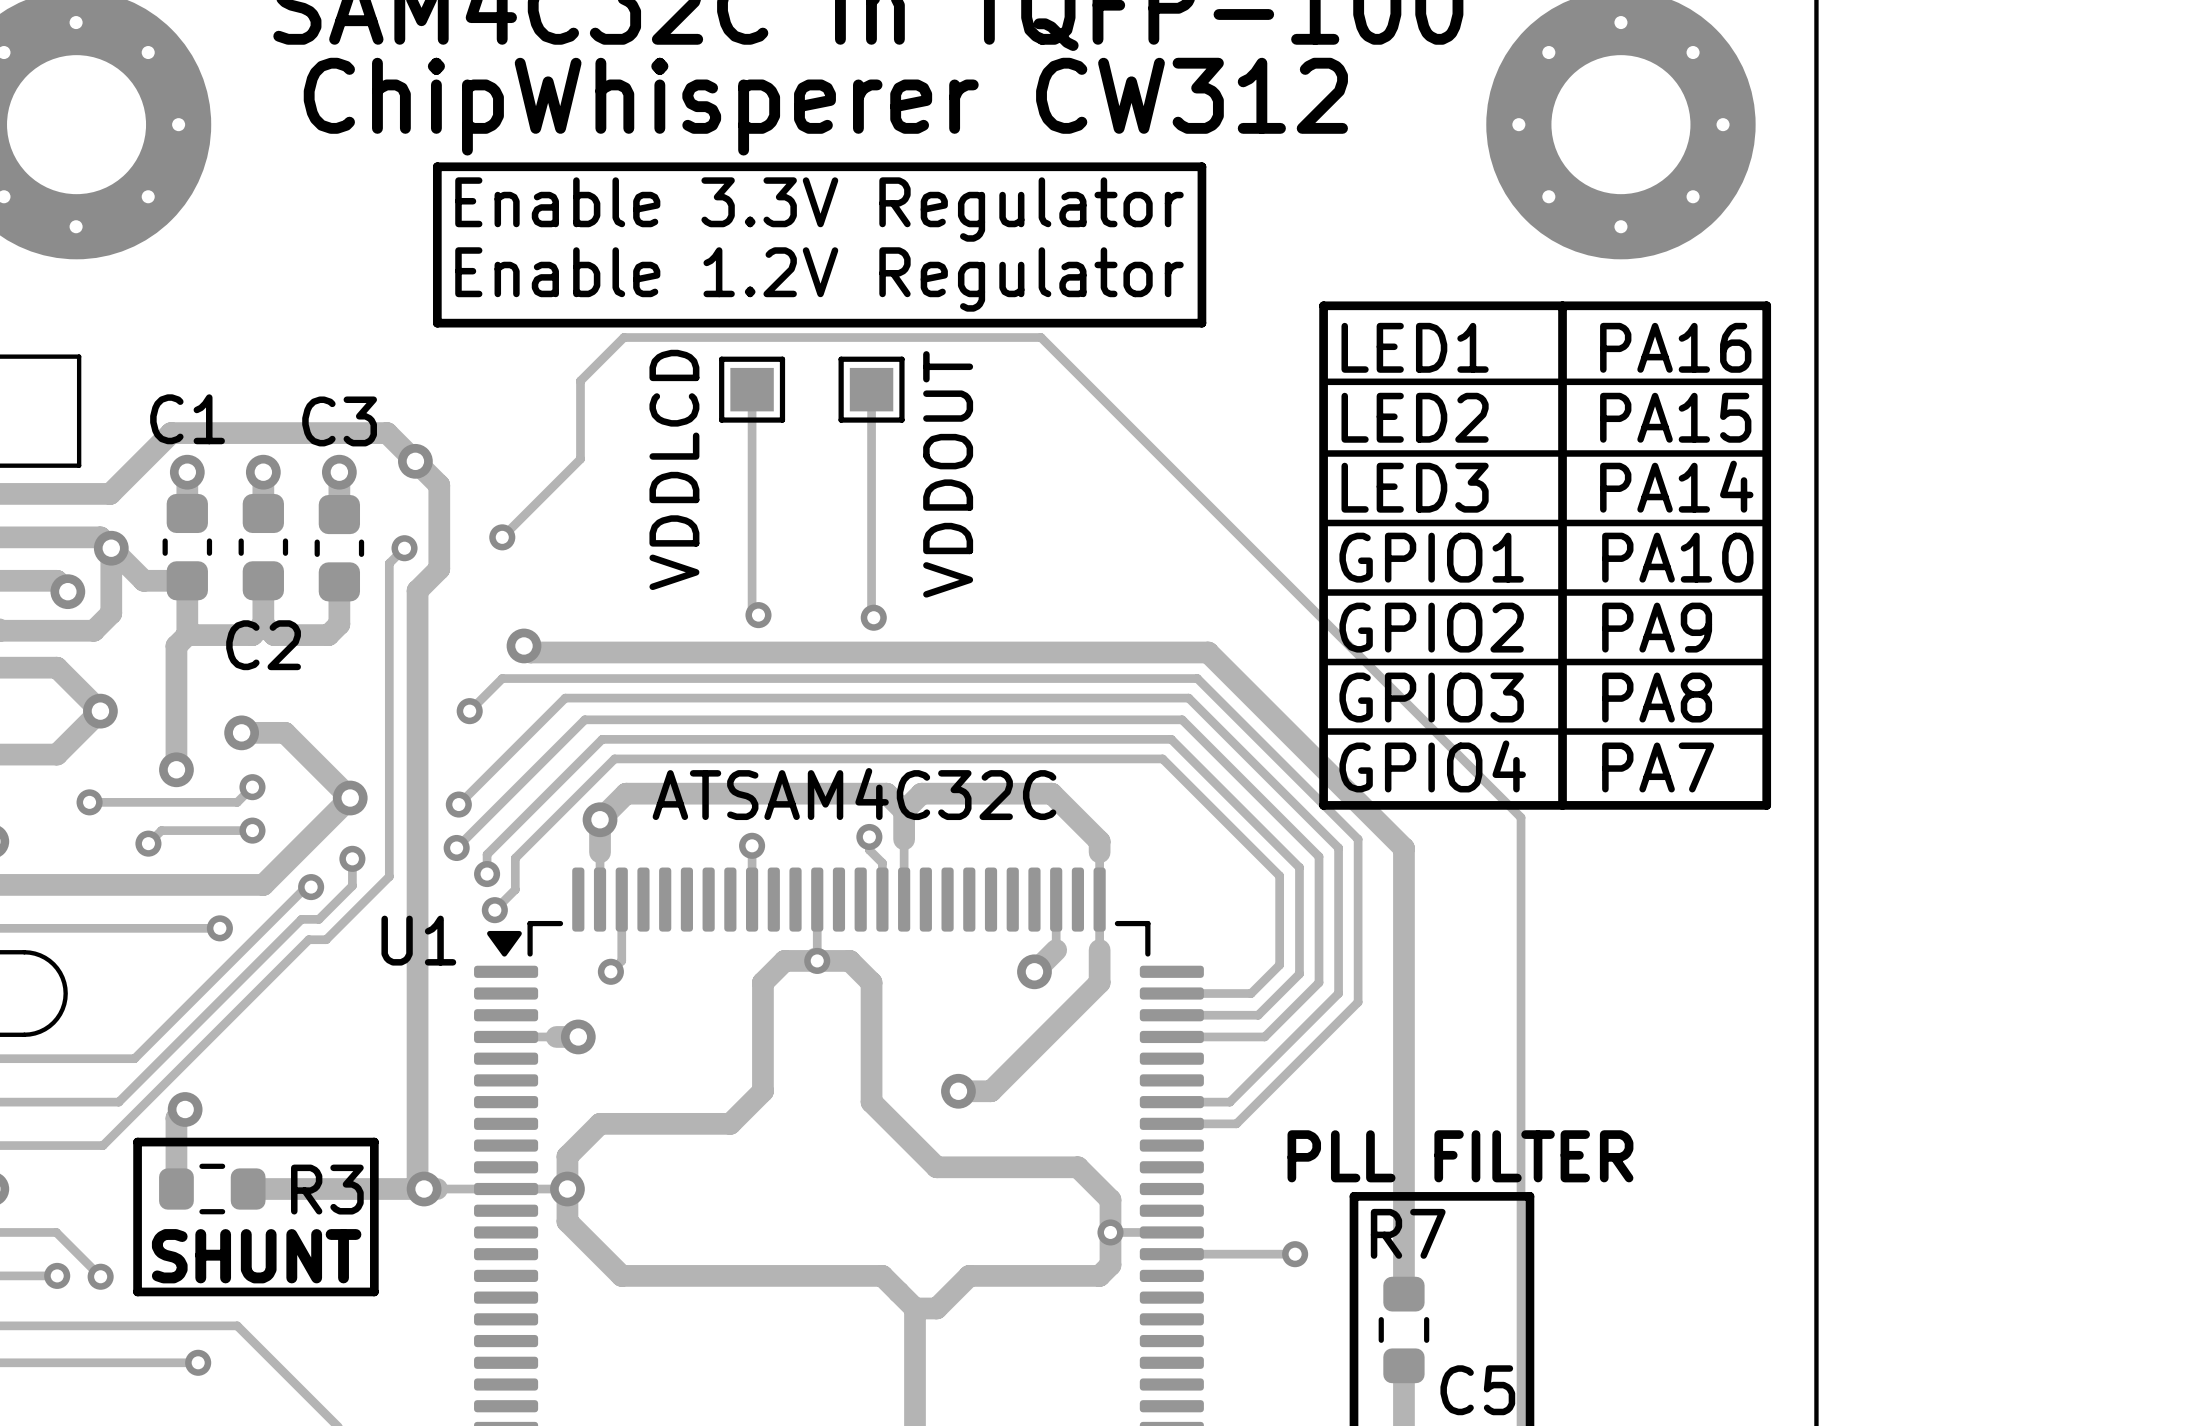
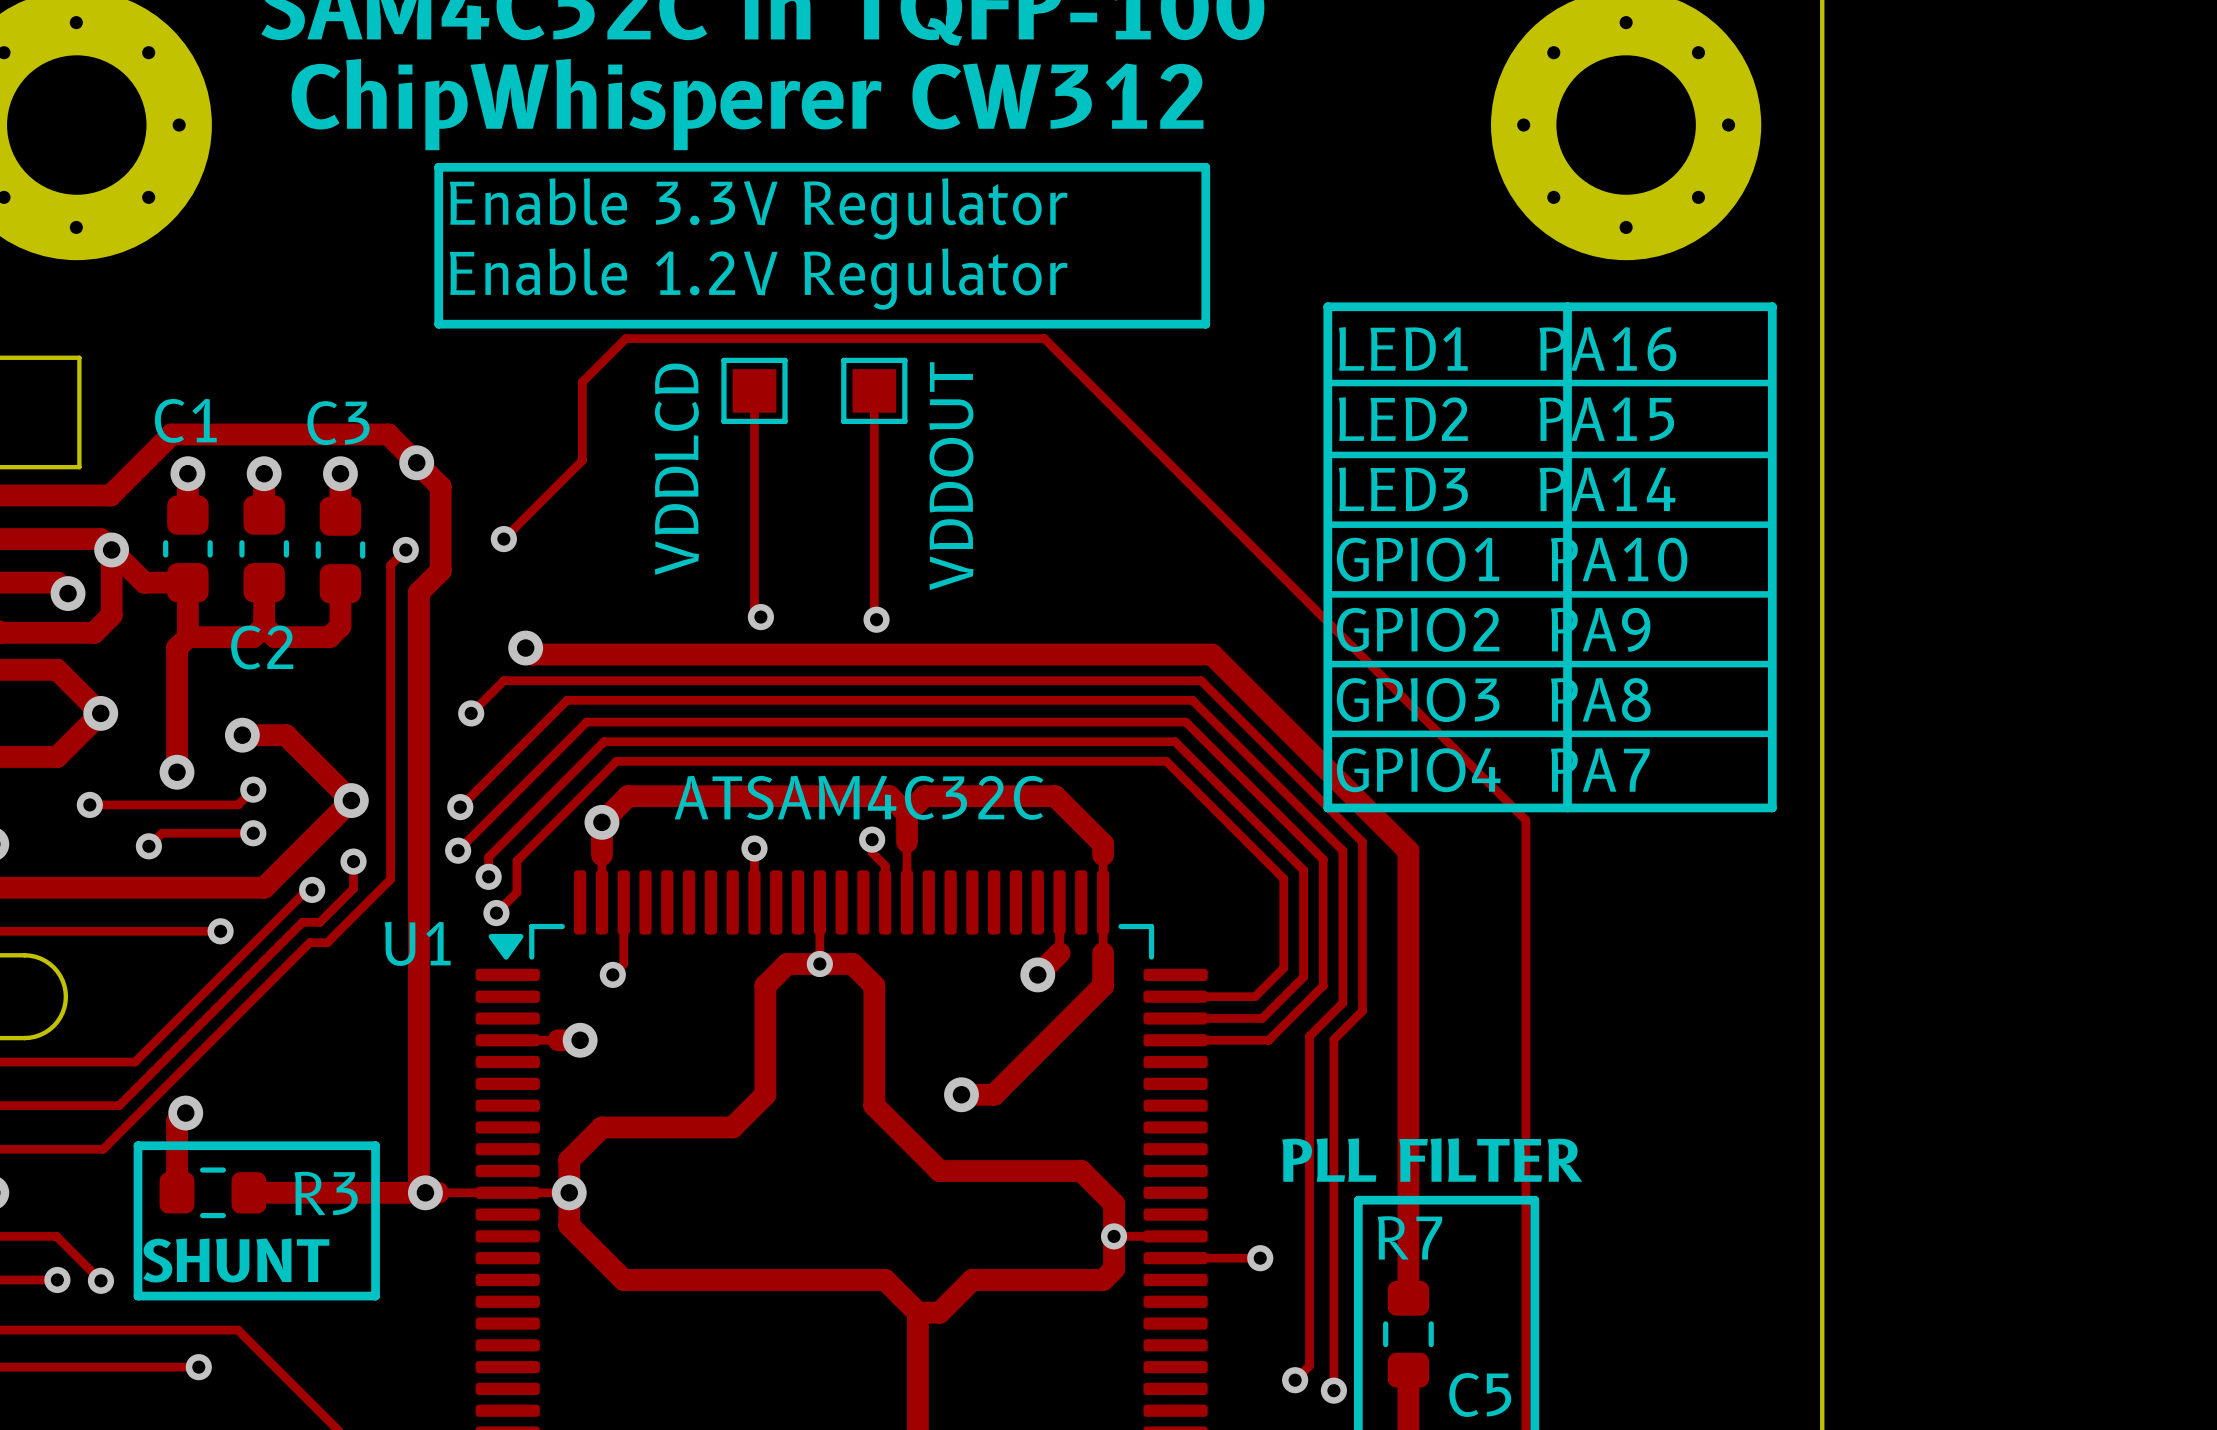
track: (1338, 993) (1229, 1102) (1171, 1102) -> (1342, 996) (1342, 1002) (1309, 1036) (1309, 1365) (1295, 1380)
track: (1358, 1002) (1236, 1123) (1171, 1123) -> (1362, 1005) (1362, 1011) (1333, 1039) (1333, 1390)
track: (1256, 1254) (1295, 1254) -> none
via position: (1295, 1254) -> (1260, 1258)
via: none -> (1295, 1380)
via: none -> (1333, 1390)

